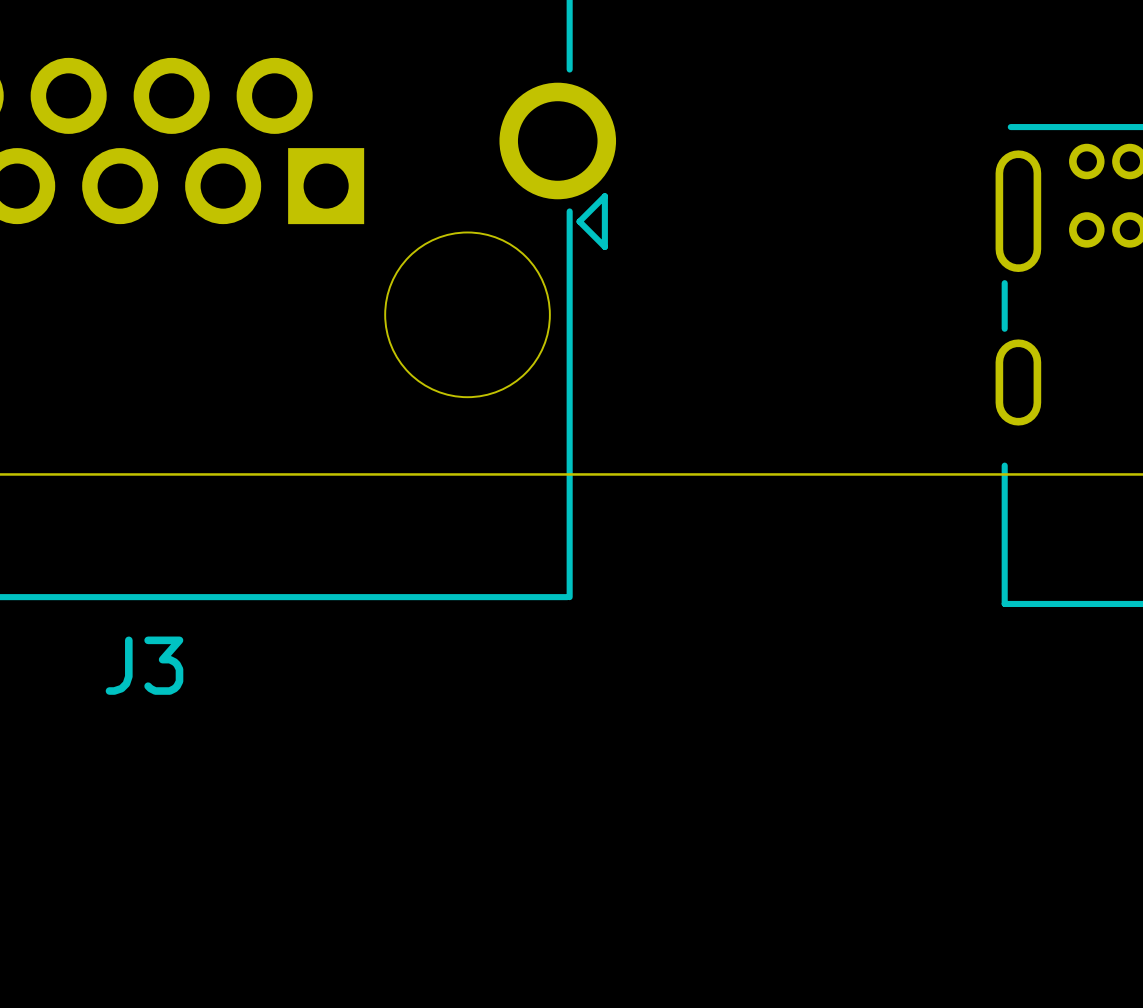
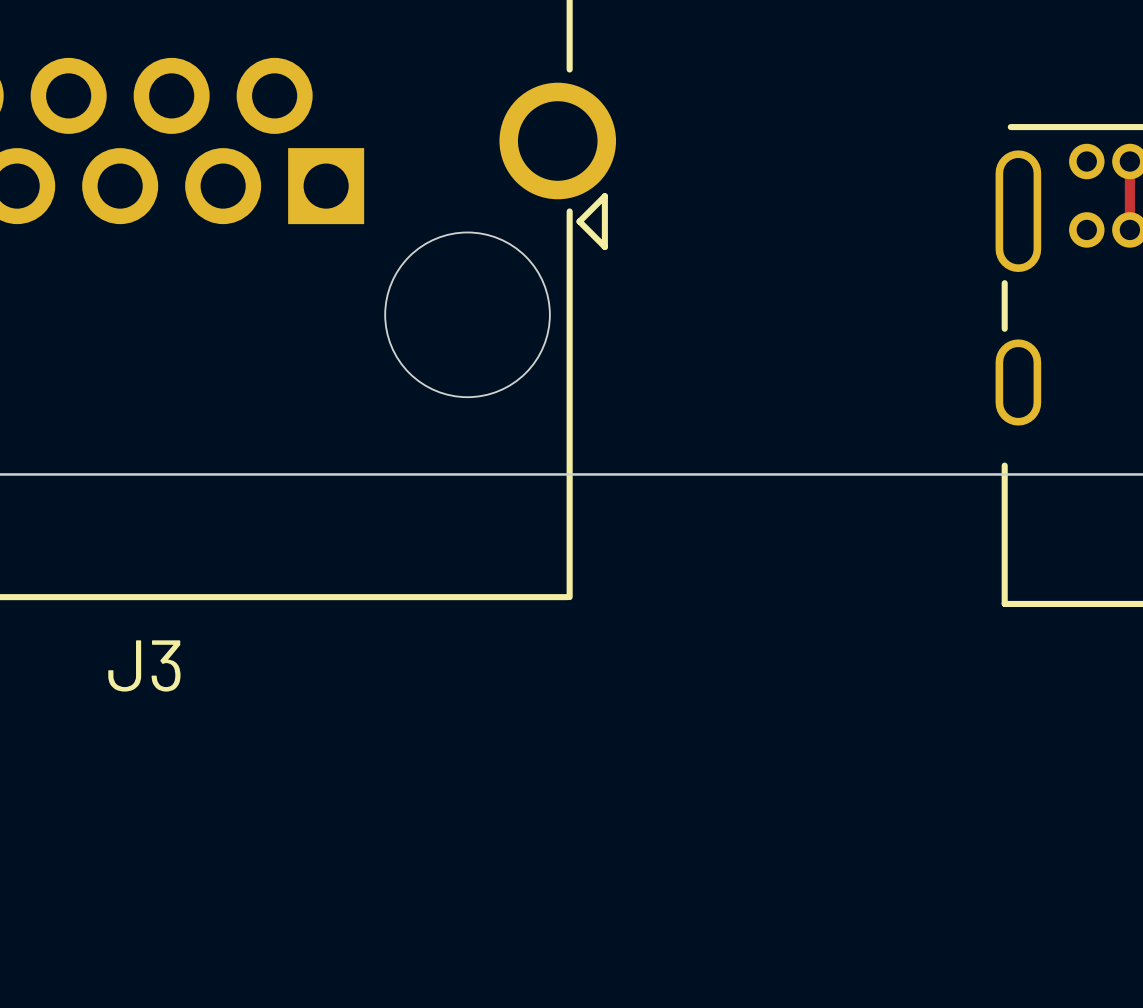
track: none -> (1129, 161) (1129, 229)

